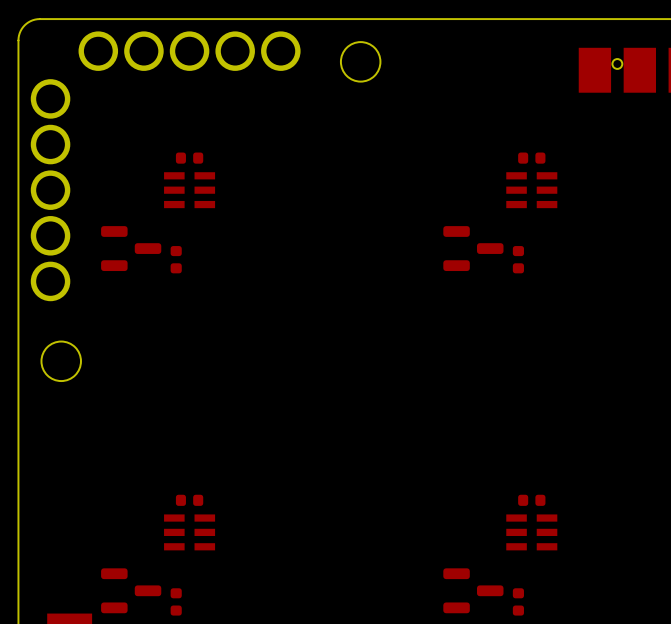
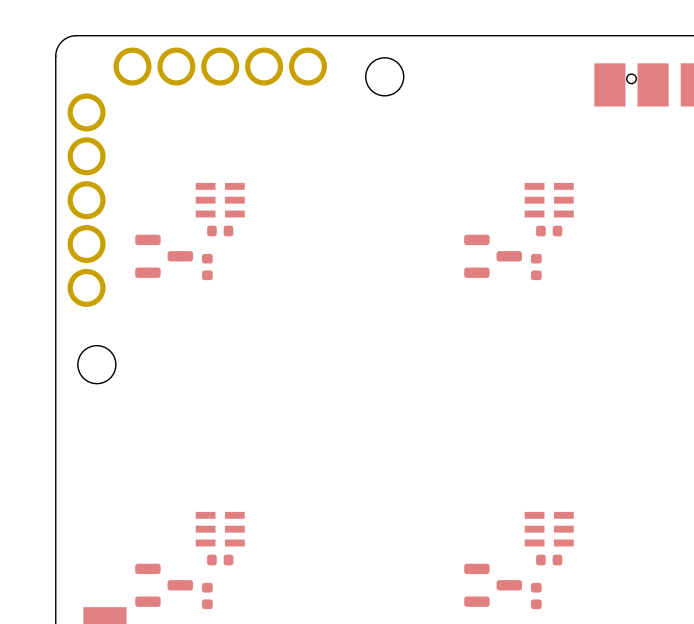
part position: (189, 158) -> (220, 231)
part position: (531, 158) -> (549, 231)
part position: (189, 500) -> (220, 560)
part position: (531, 500) -> (549, 560)

